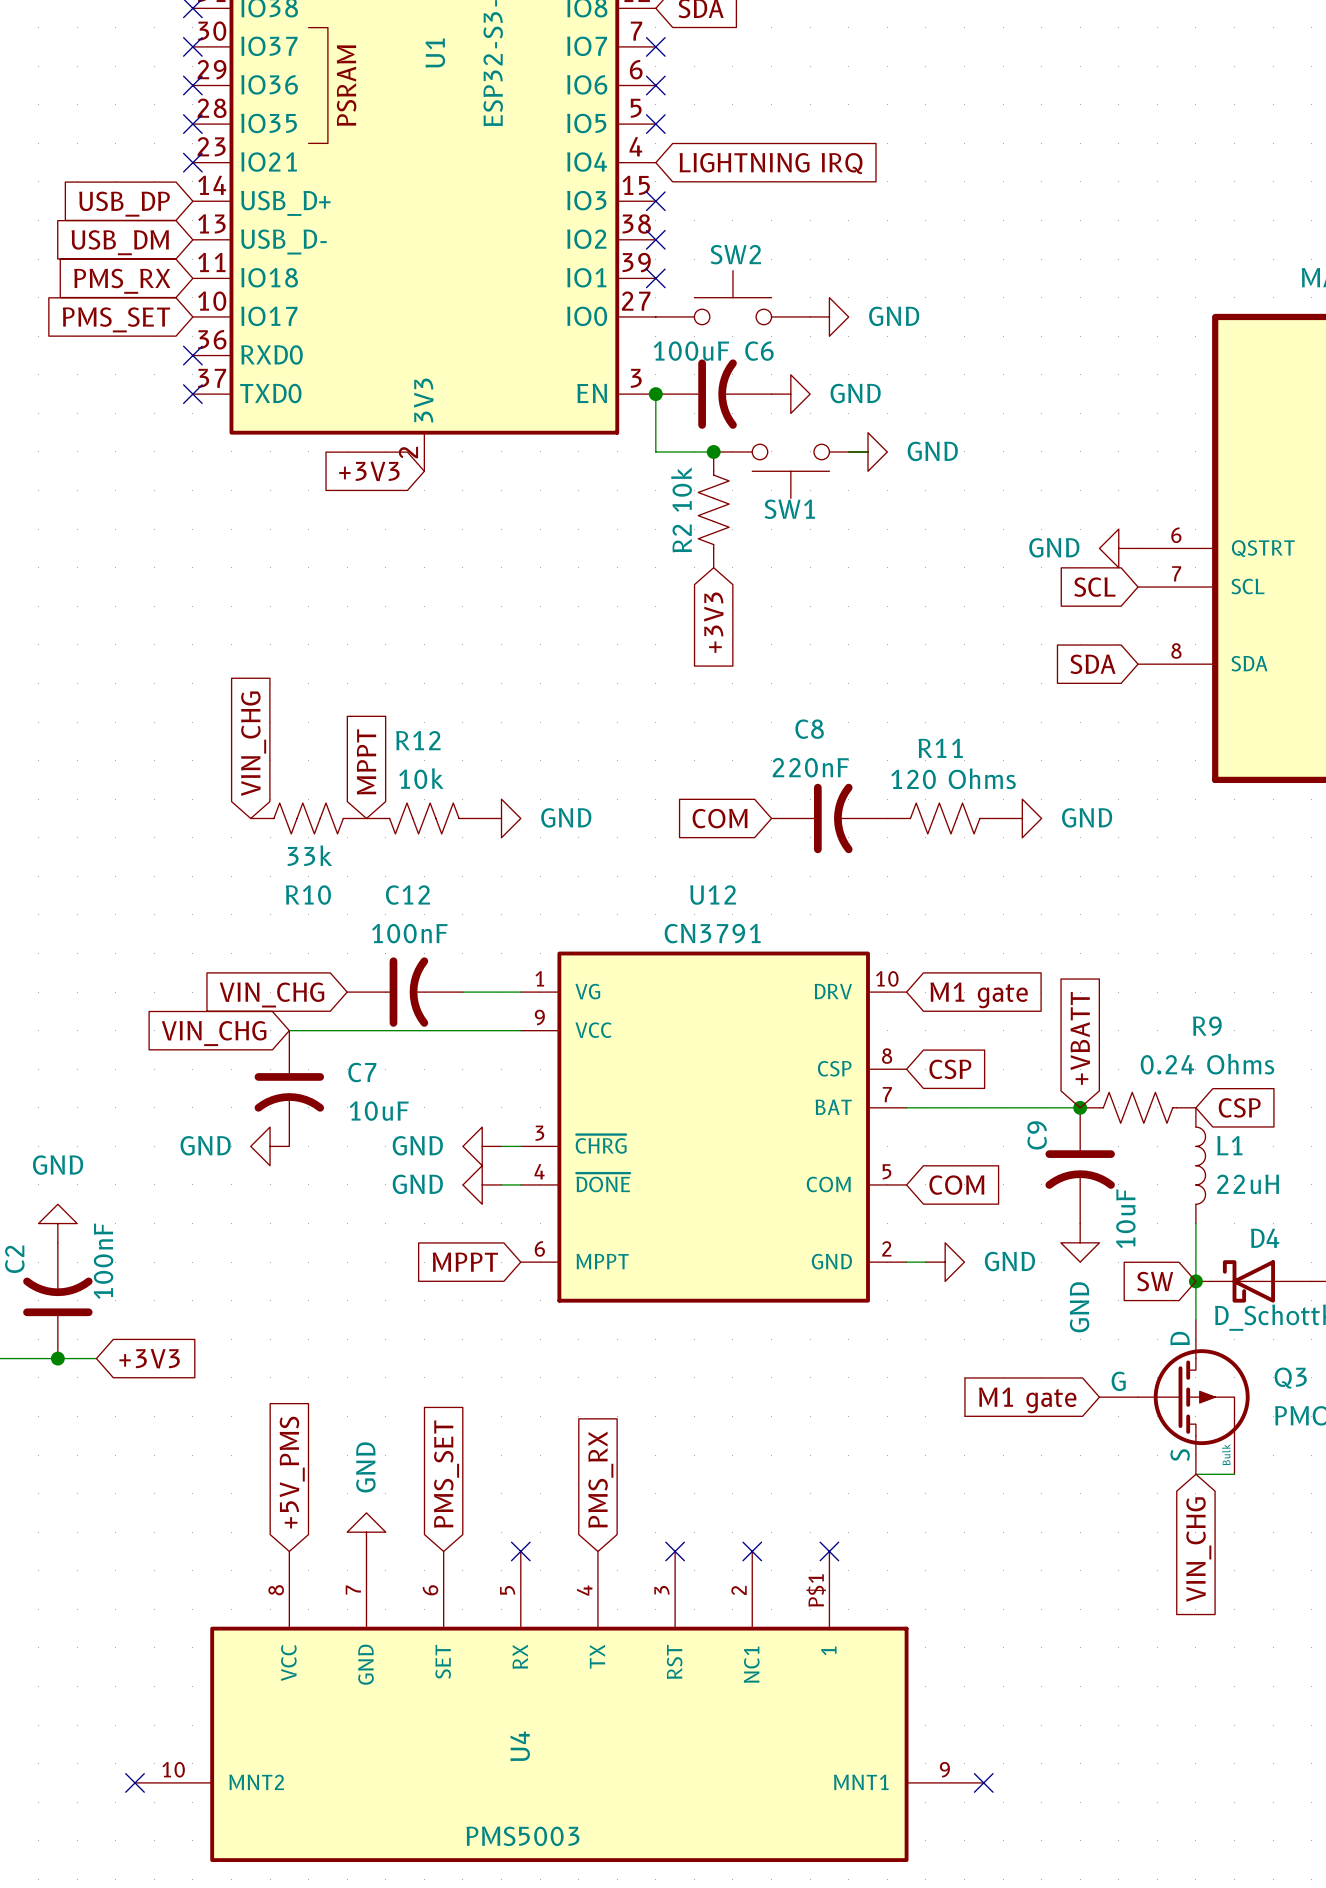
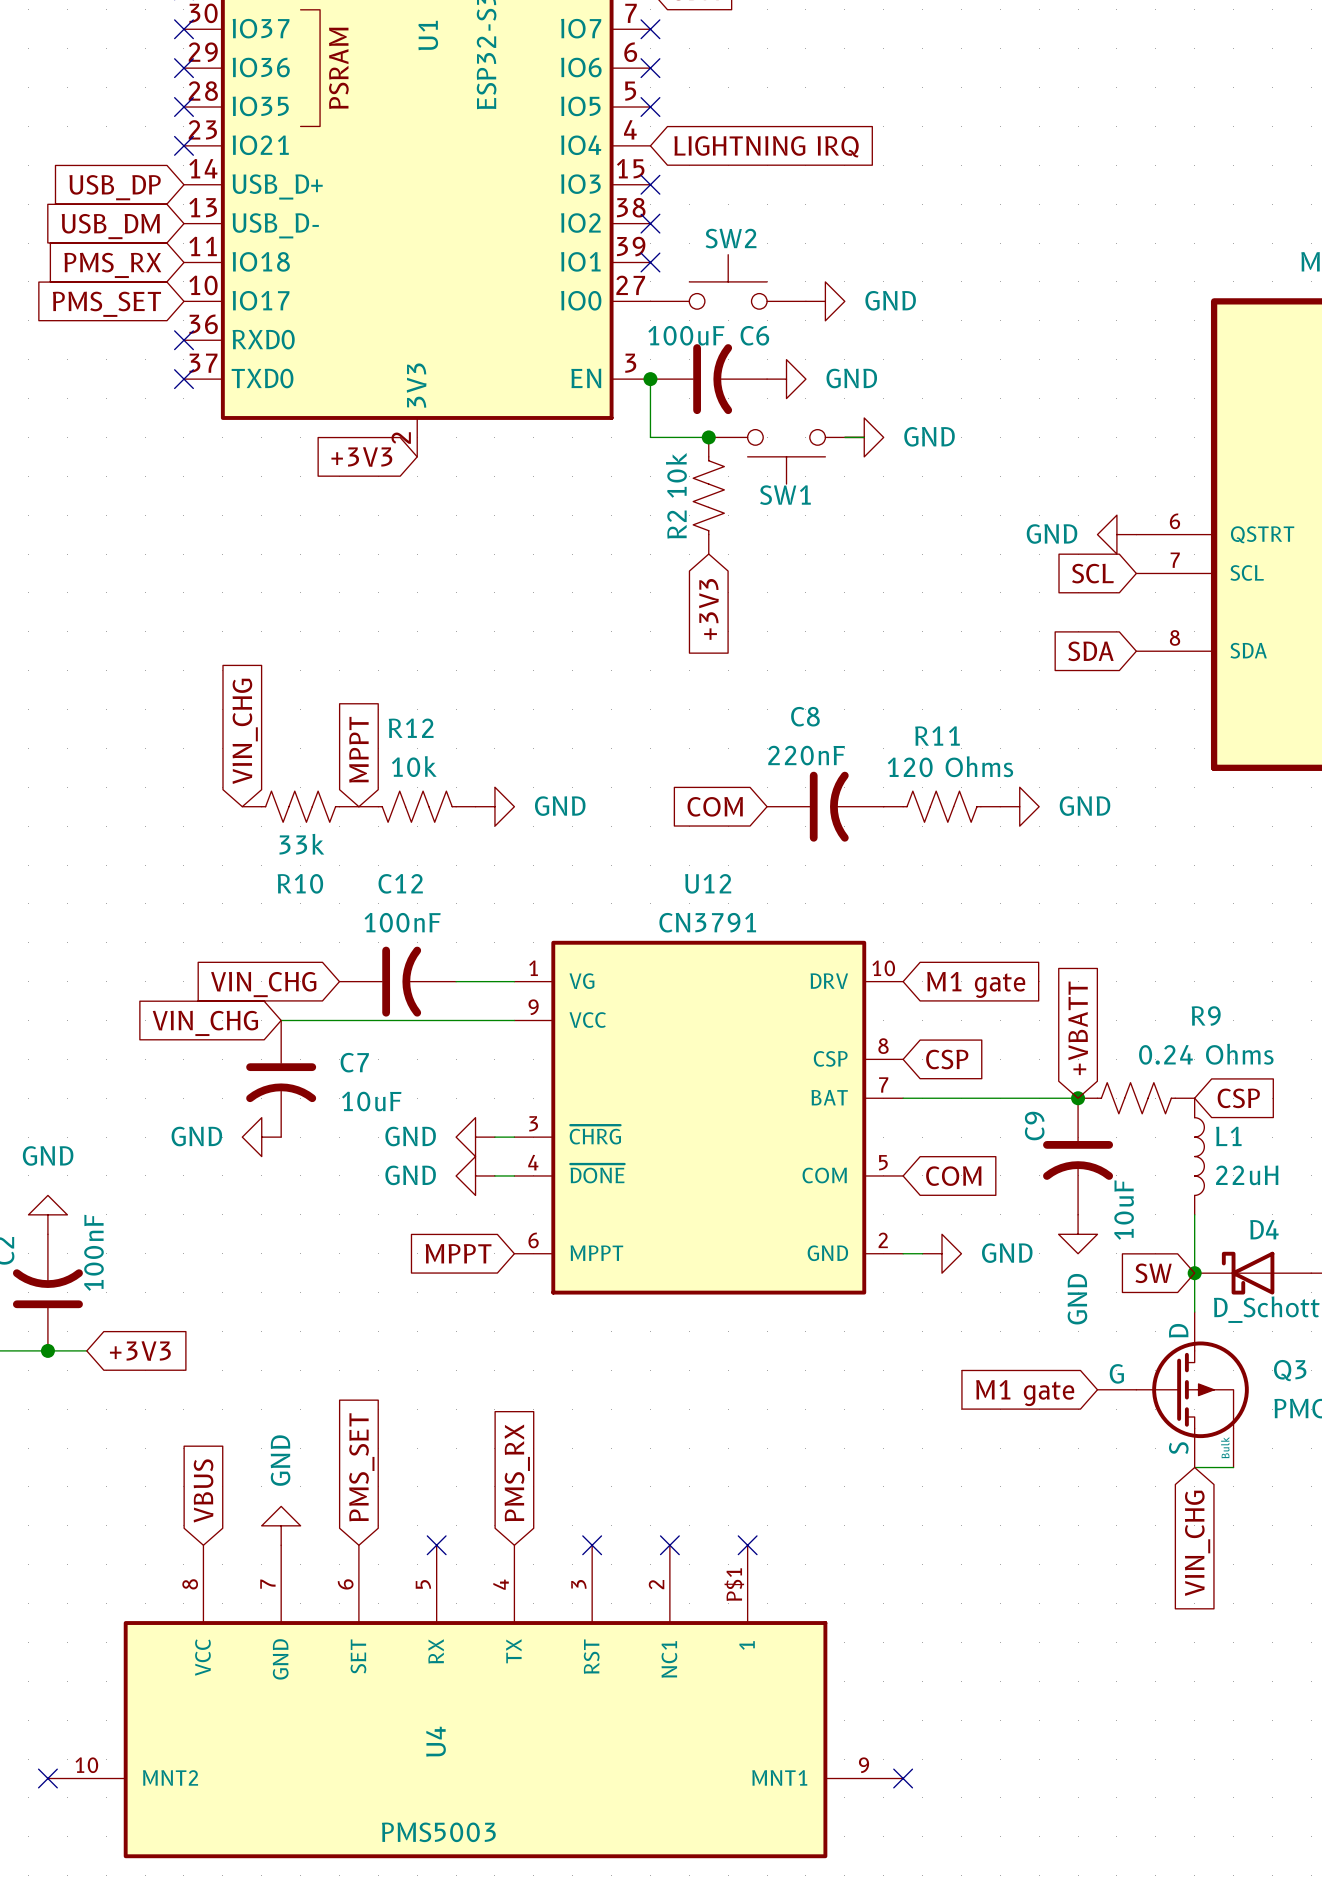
global label: +5V_PMS (292, 1472) -> none
global label position: PMS_SET (446, 1474) -> PMS_SET (361, 1467)
global label position: PMS_RX (600, 1479) -> PMS_RX (517, 1472)
global label: none -> VBUS (203, 1490)
power symbol position: GND (366, 1532) -> GND (281, 1525)
no-connect mark: none -> (436, 1545)
no-connect mark: (520, 1551) -> none
no-connect mark: none -> (592, 1545)
no-connect mark: (829, 1551) -> none
U4 position: (559, 1706) -> (475, 1701)
no-connect mark position: (135, 1782) -> (47, 1778)
no-connect mark position: (983, 1782) -> (903, 1778)

